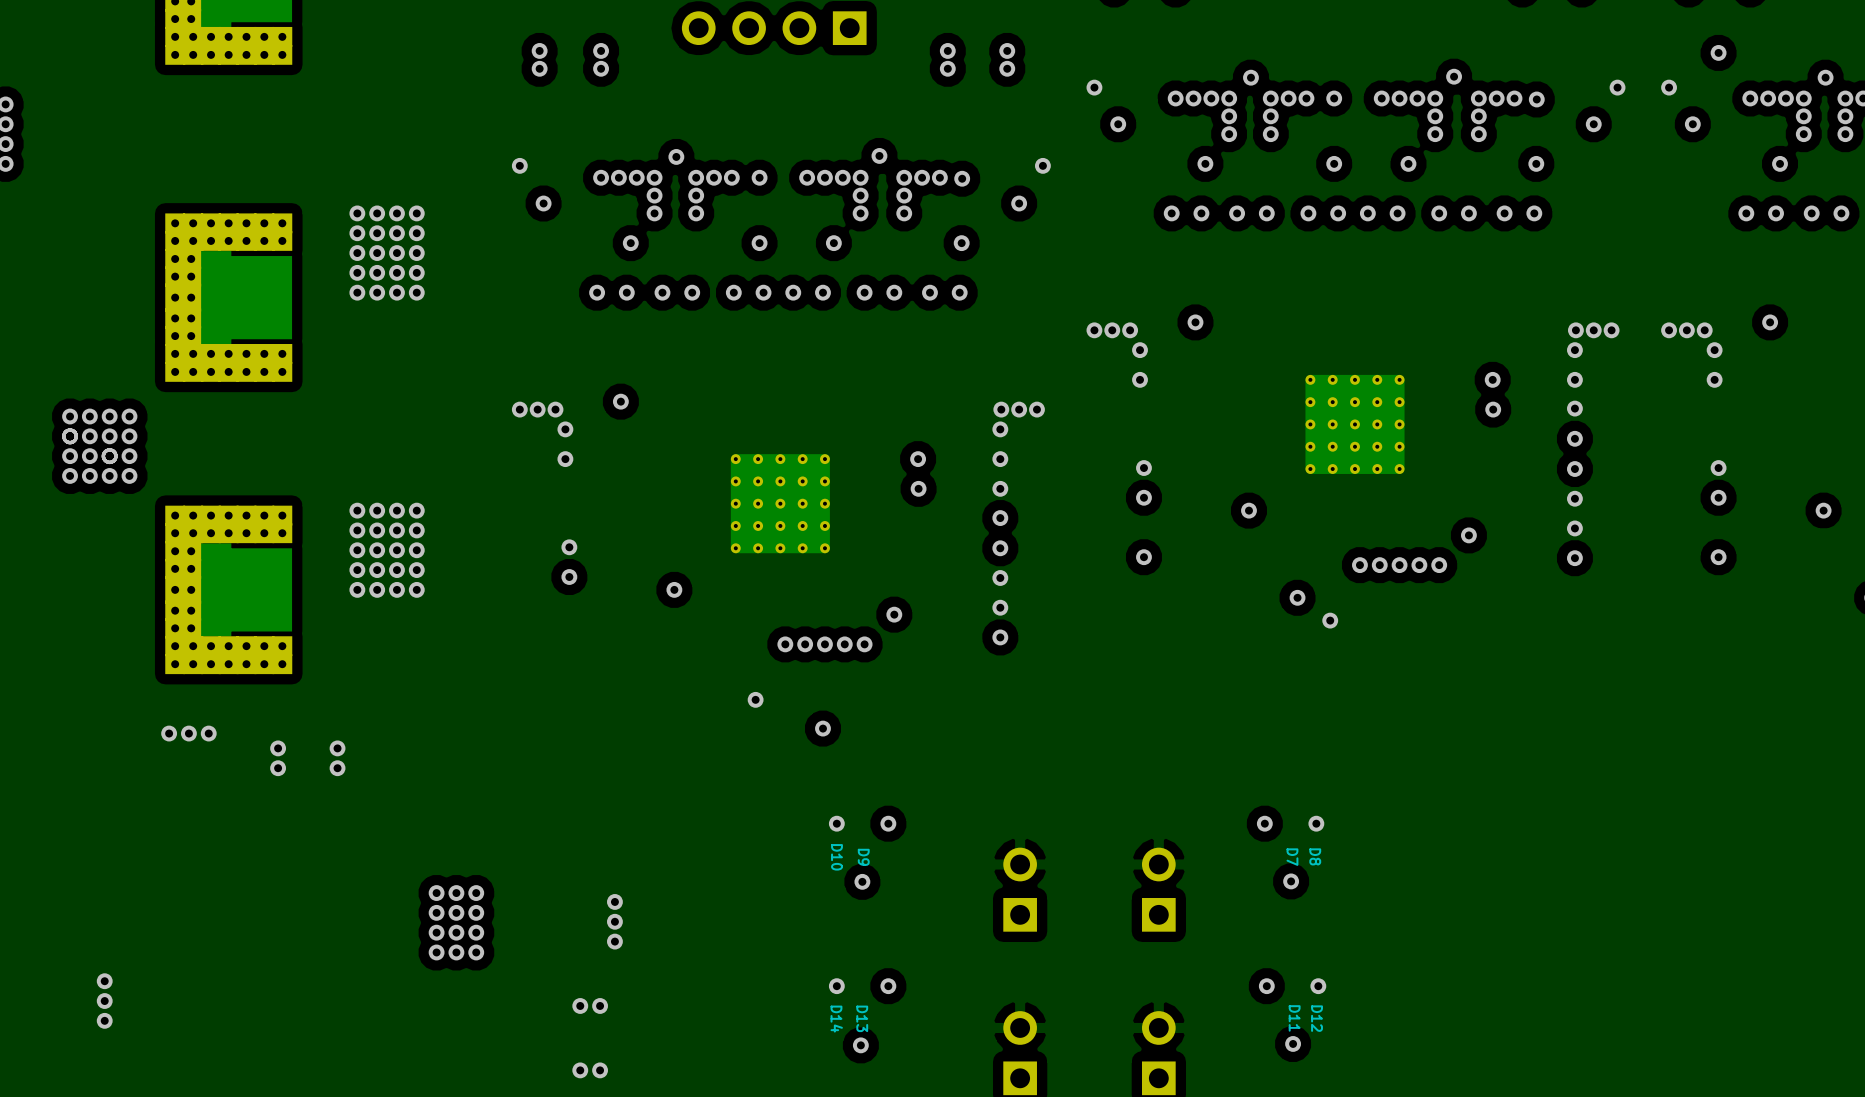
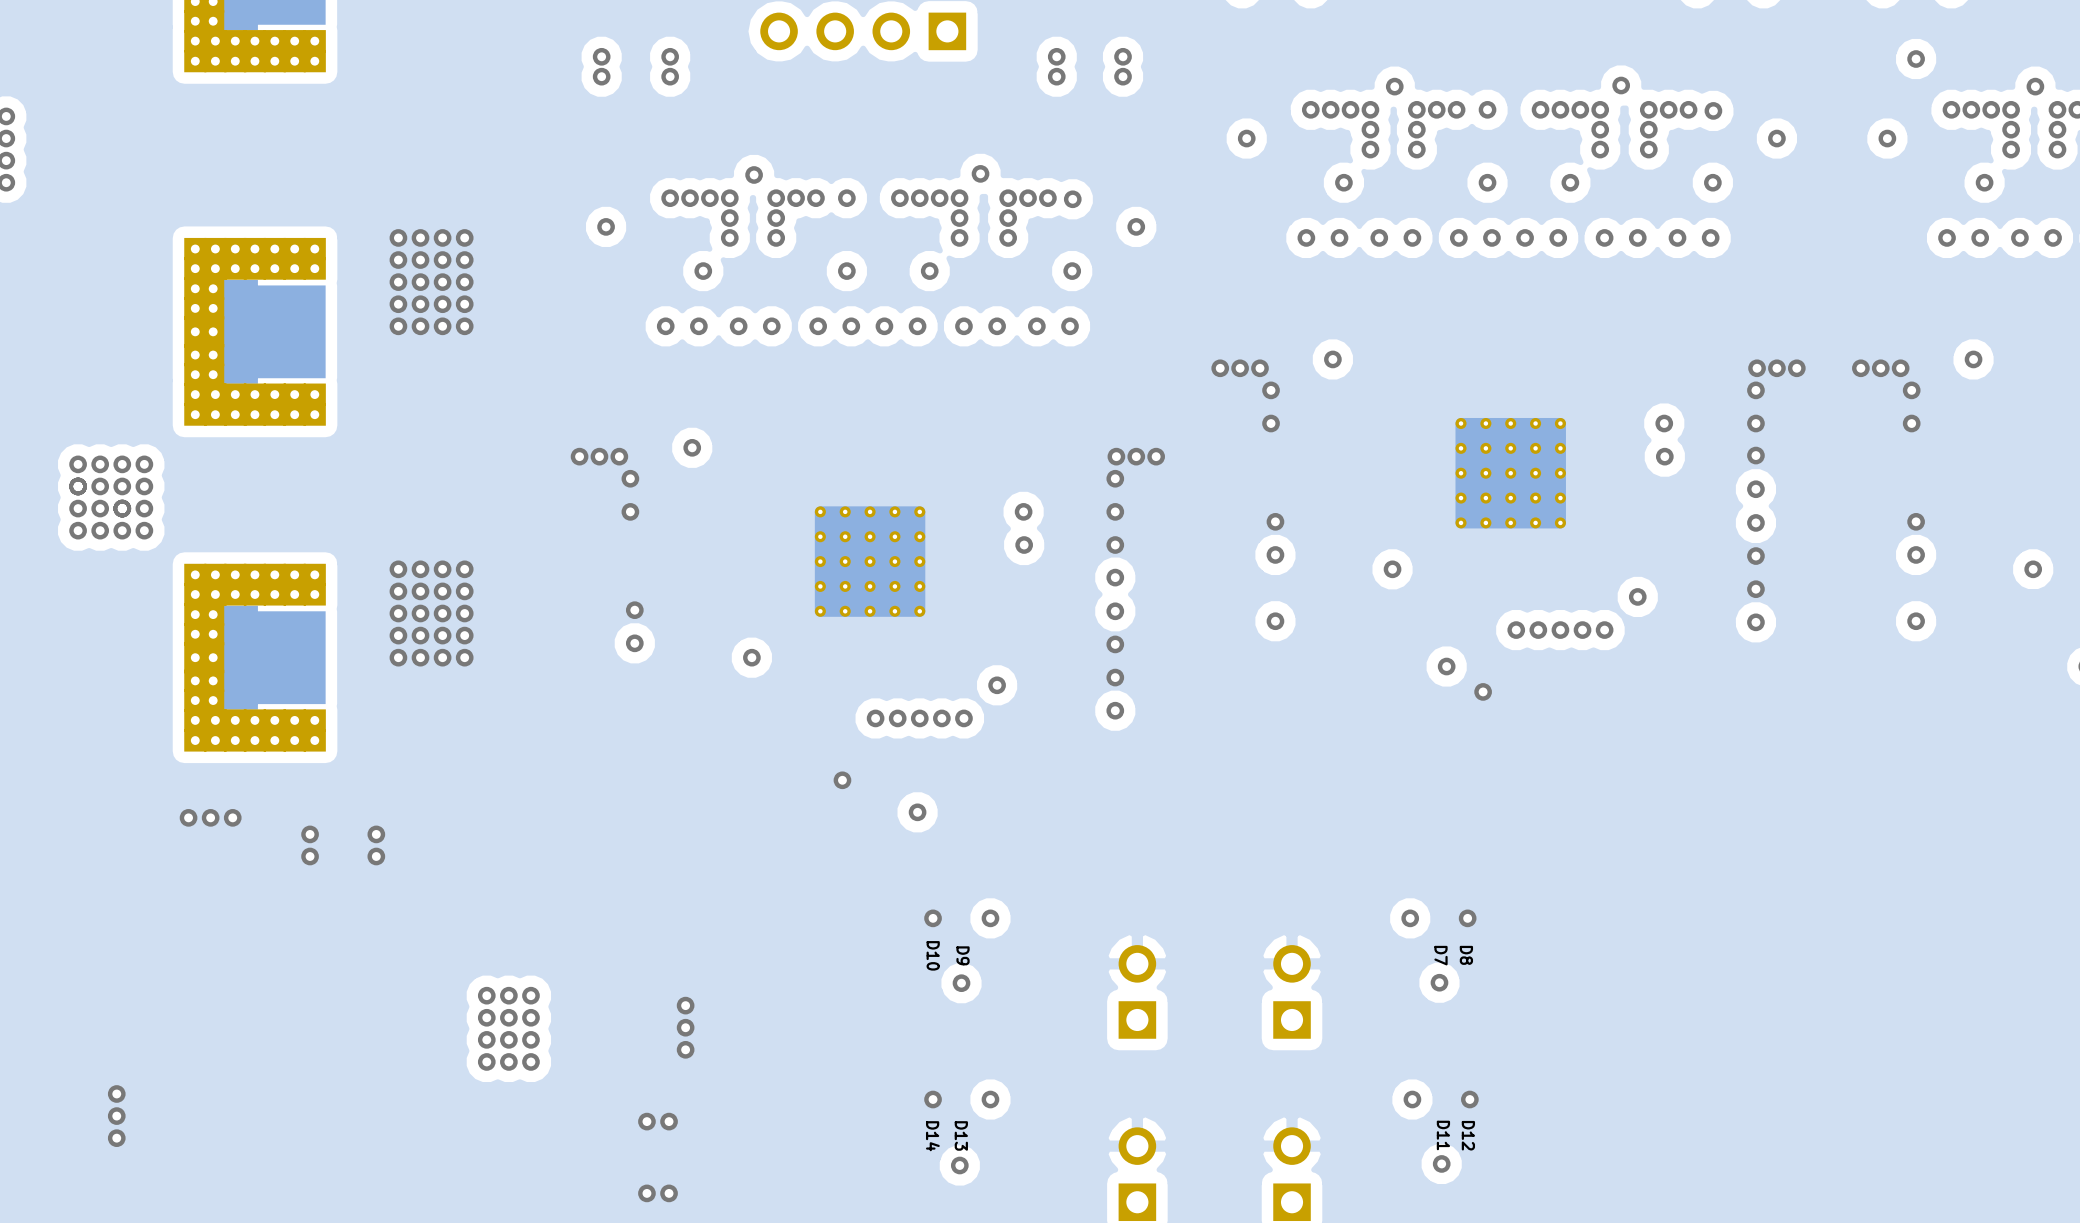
via: (1094, 87) -> none
via: (1617, 87) -> none
via: (1669, 87) -> none
via: (519, 165) -> none
via: (1042, 165) -> none

